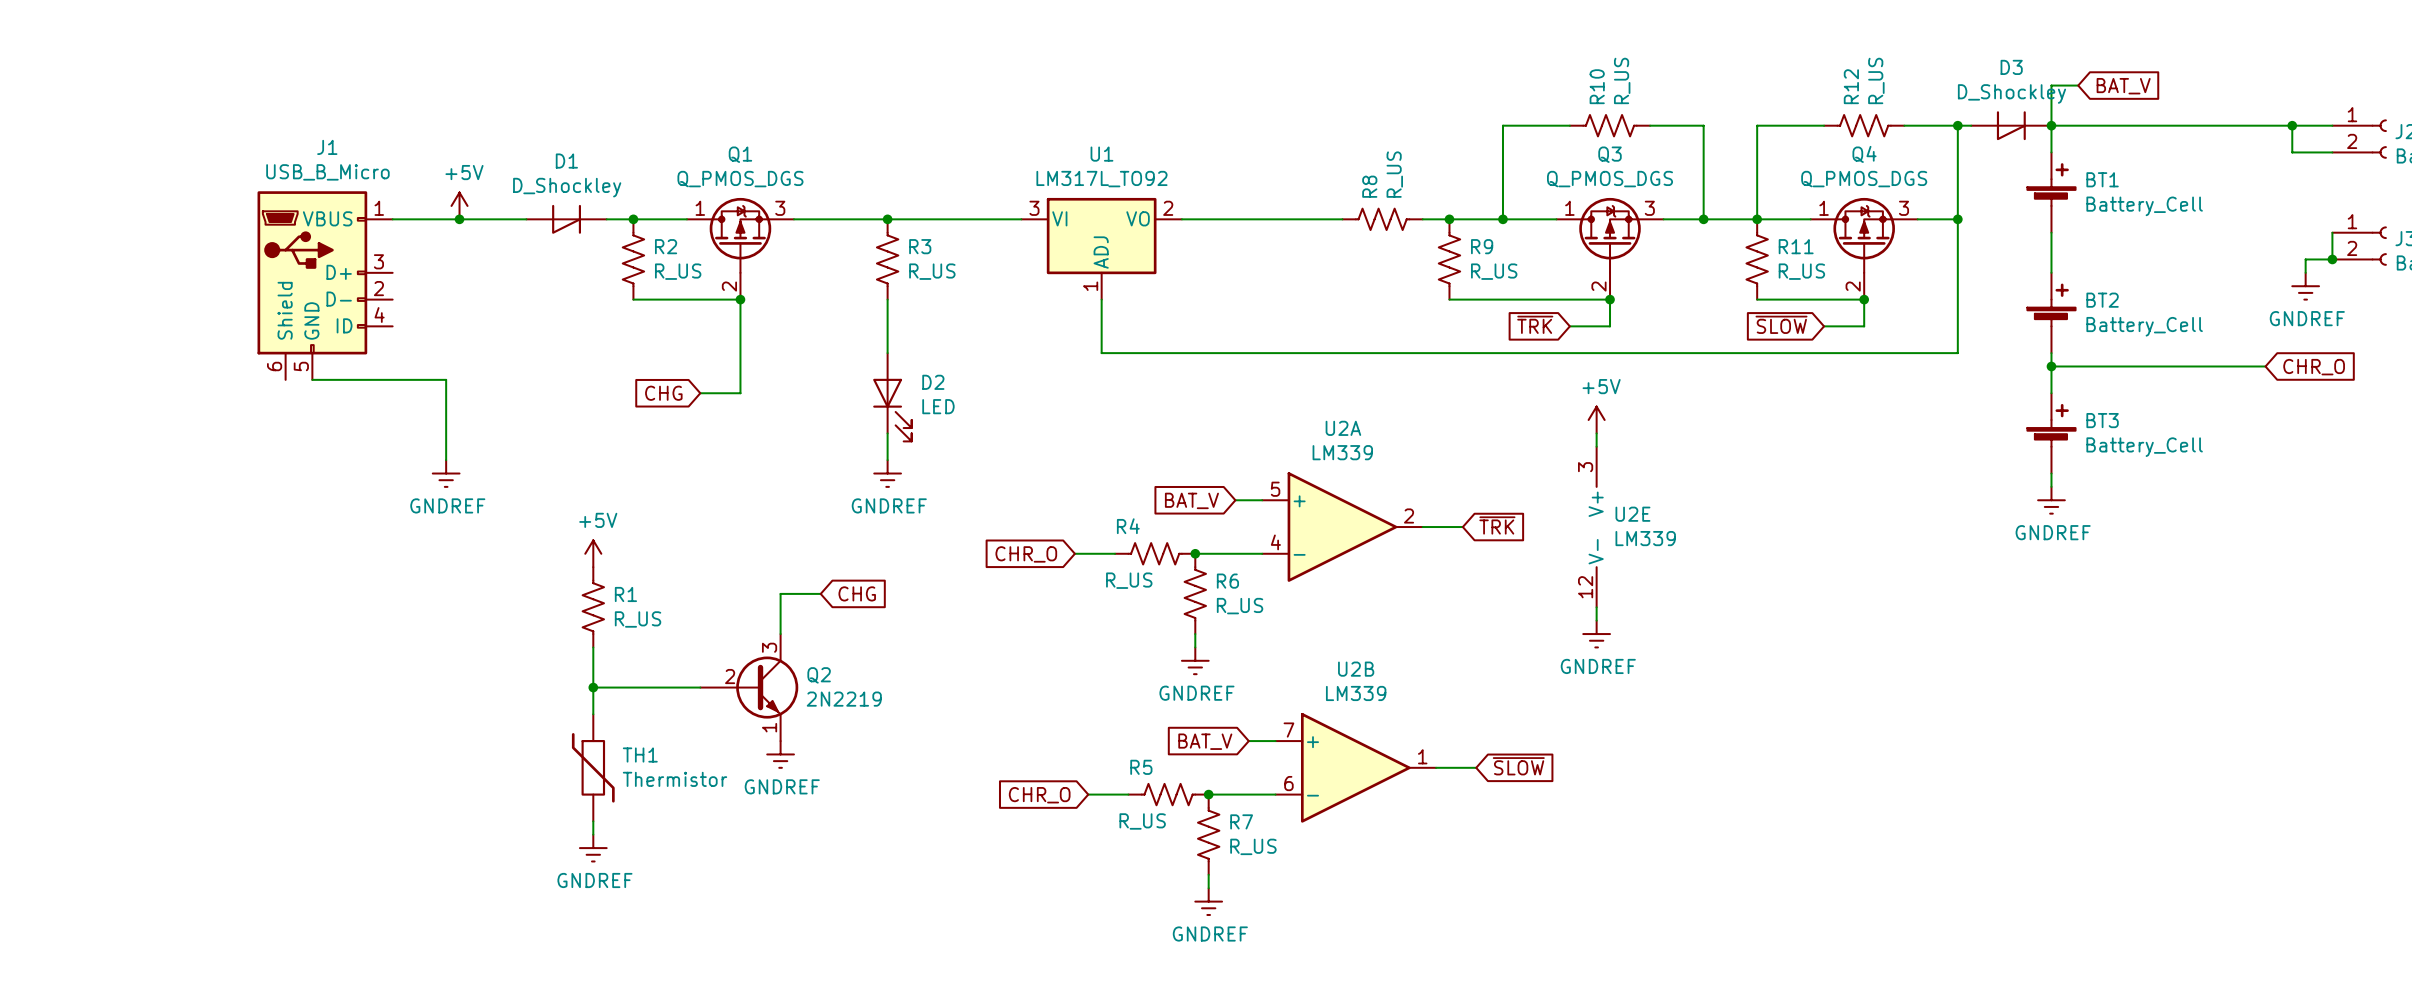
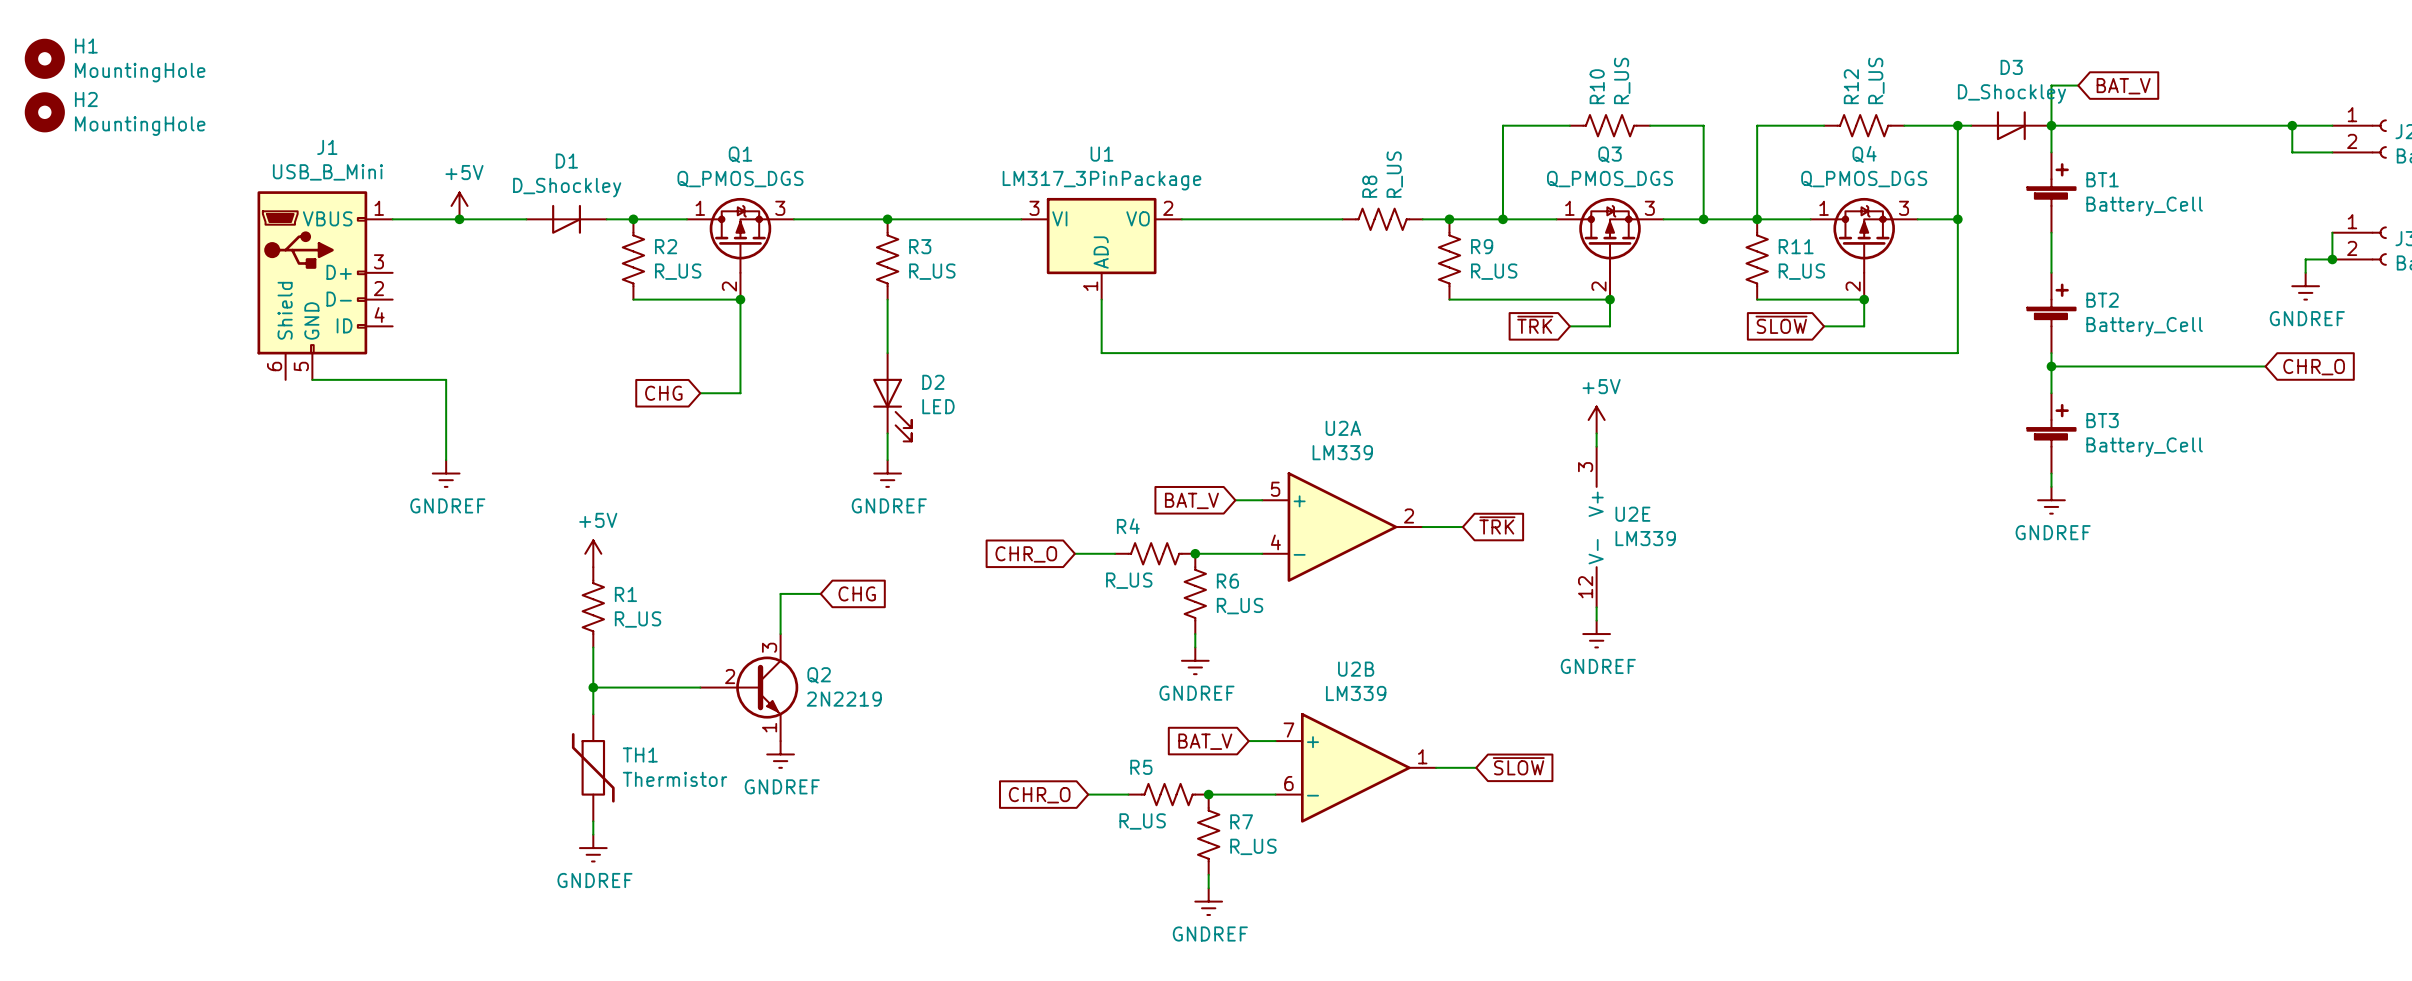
H1: none -> MountingHole (44, 58)
H2: none -> MountingHole (44, 112)
J1 value: USB_B_Micro (327, 172) -> USB_B_Mini (327, 172)
U1 value: LM317L_TO92 (1101, 179) -> LM317_3PinPackage (1101, 180)

